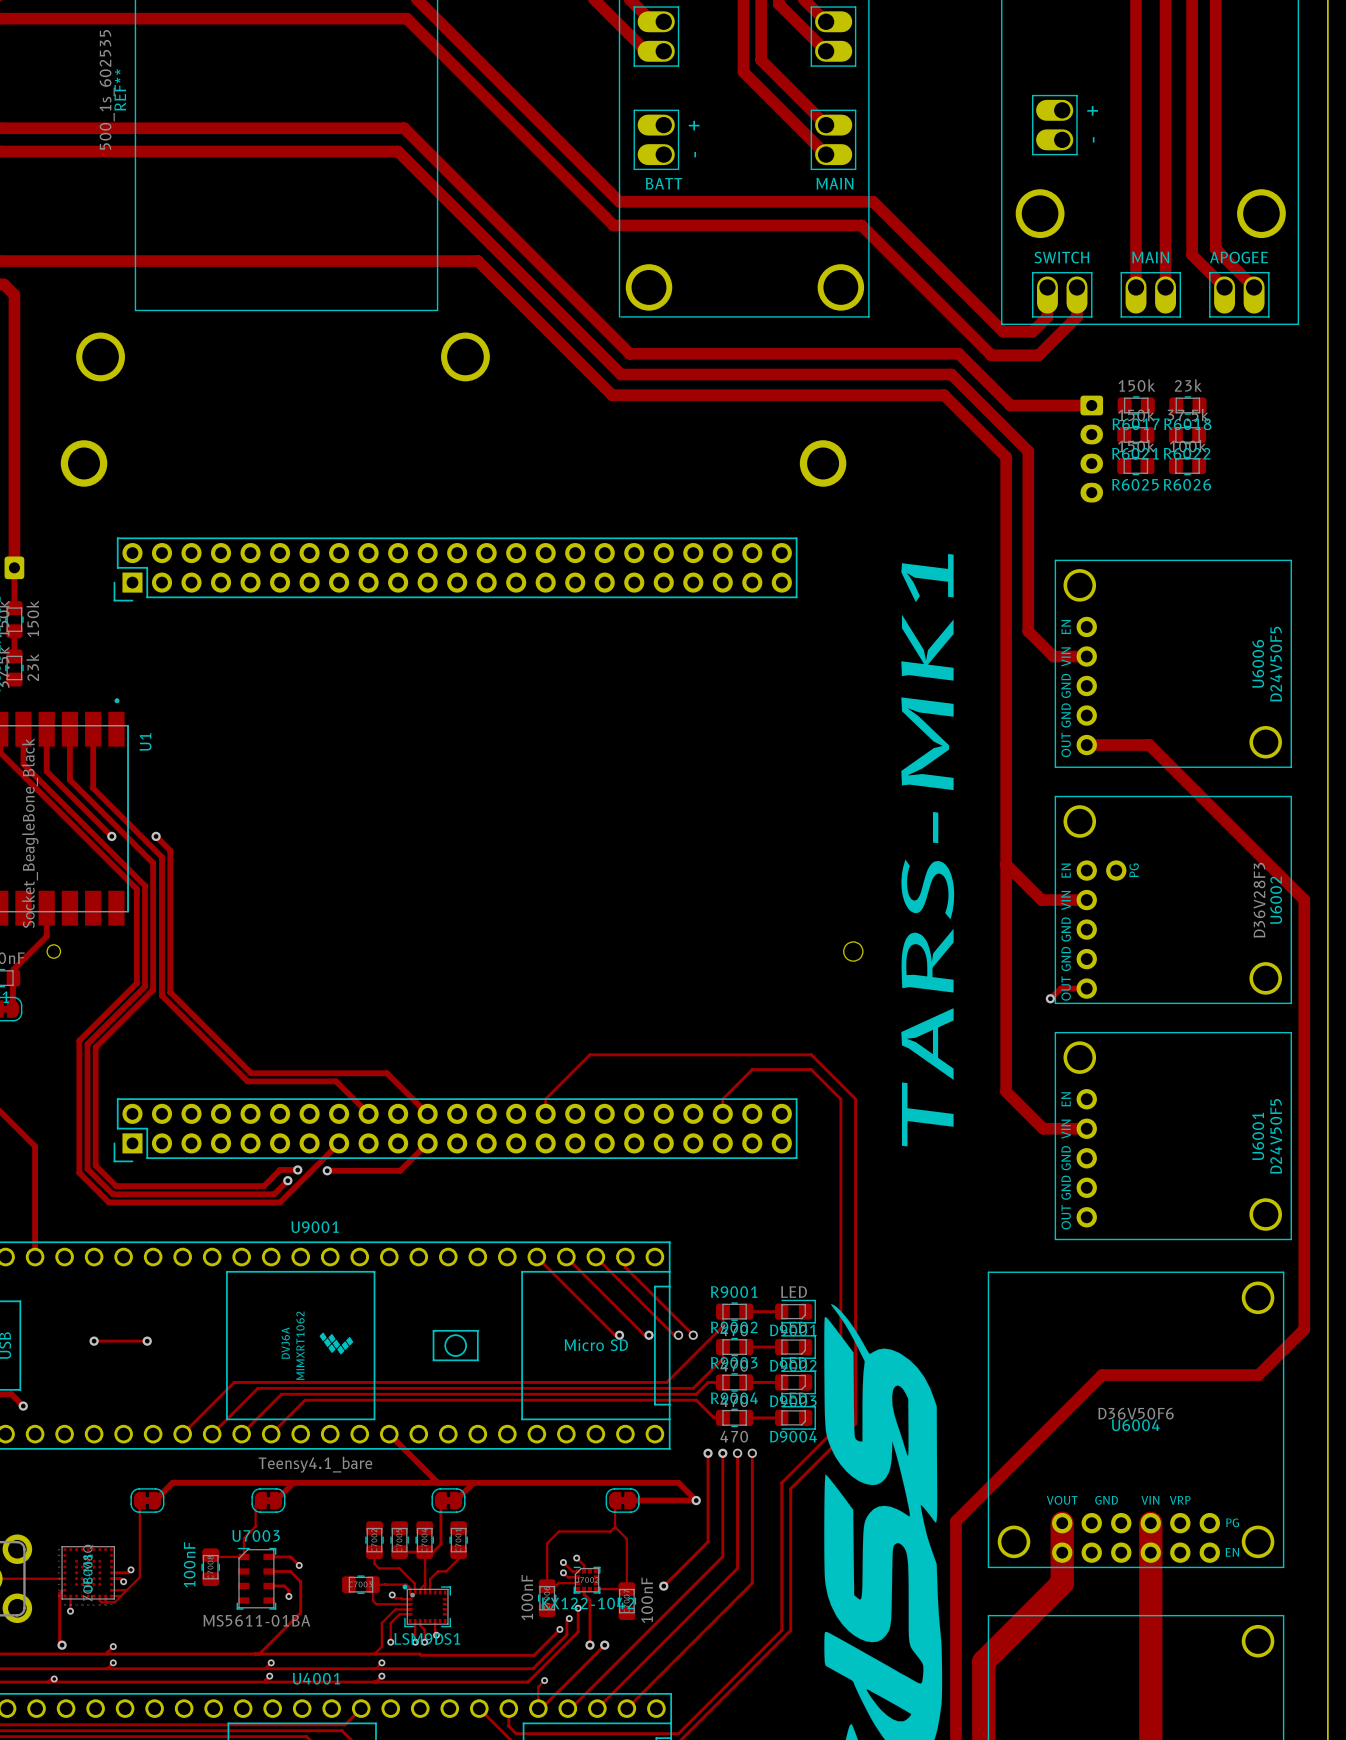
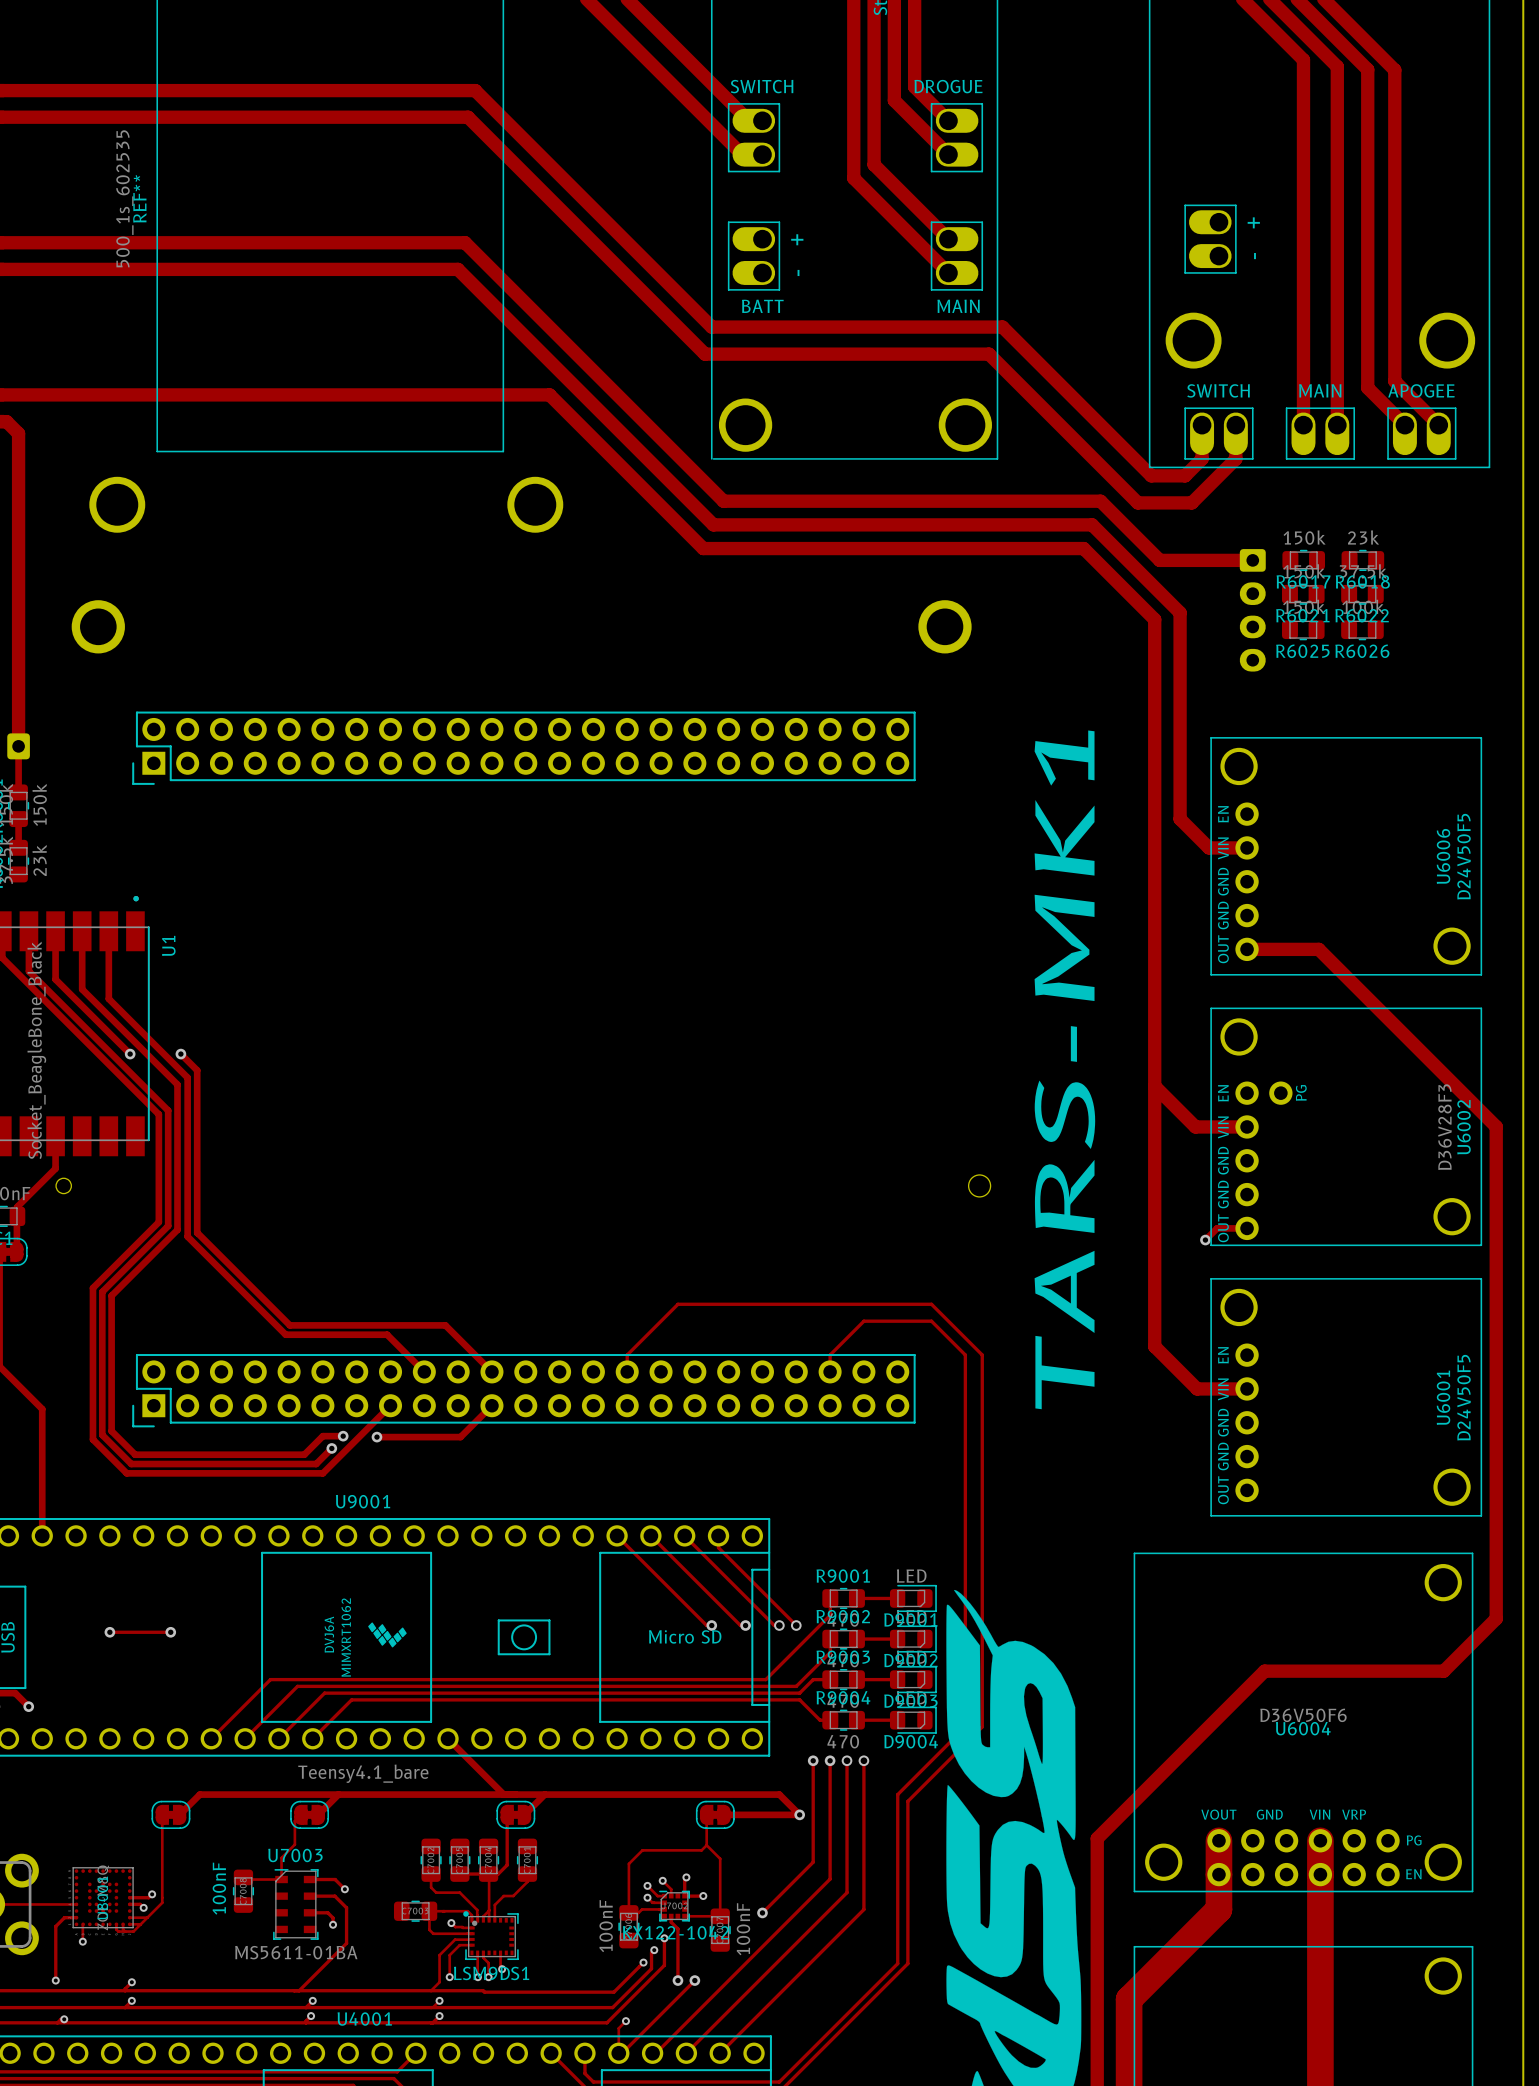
track: none -> (686, 1877) (684, 1879) (684, 1896) (703, 1896)
via: none -> (686, 1877)
via: none -> (703, 1896)
track: (62, 1590) (59, 1593) (59, 1642) (62, 1645) -> none
track: none -> (76, 1917) (64, 1917) (55, 1926) (55, 1980)
via: none -> (55, 1980)
via: (62, 1645) -> none

